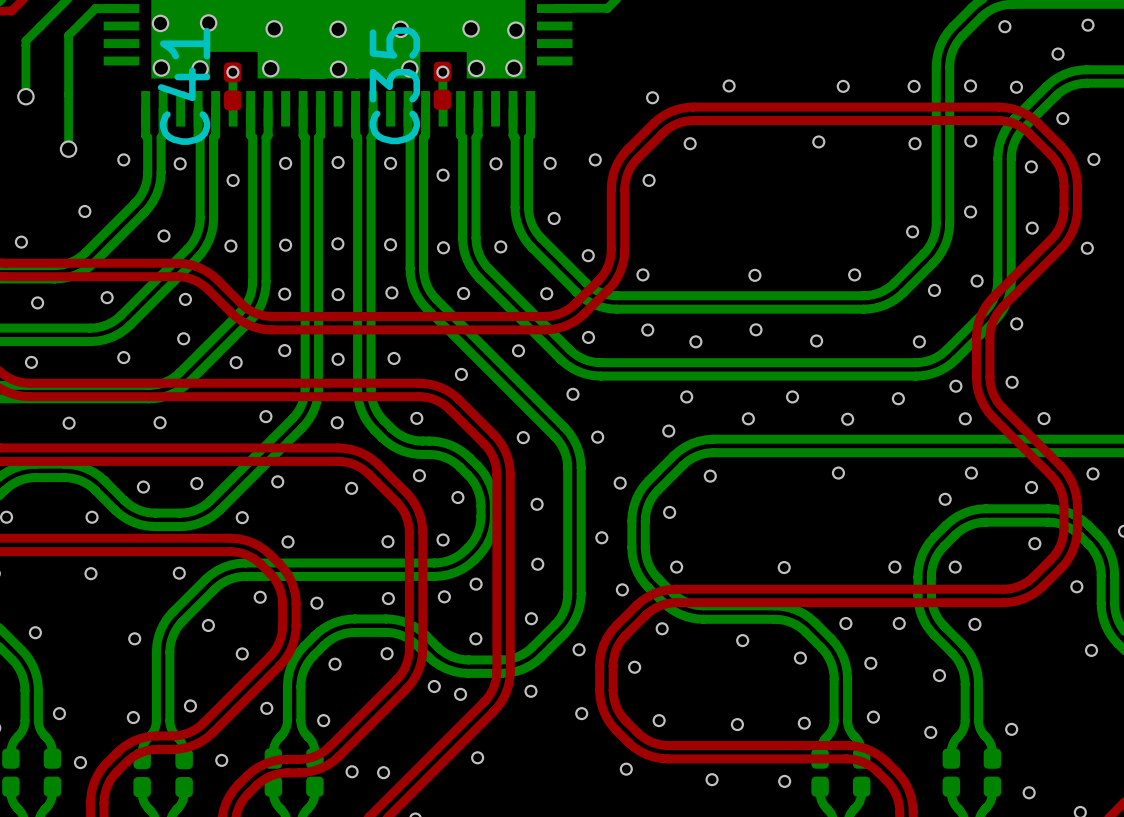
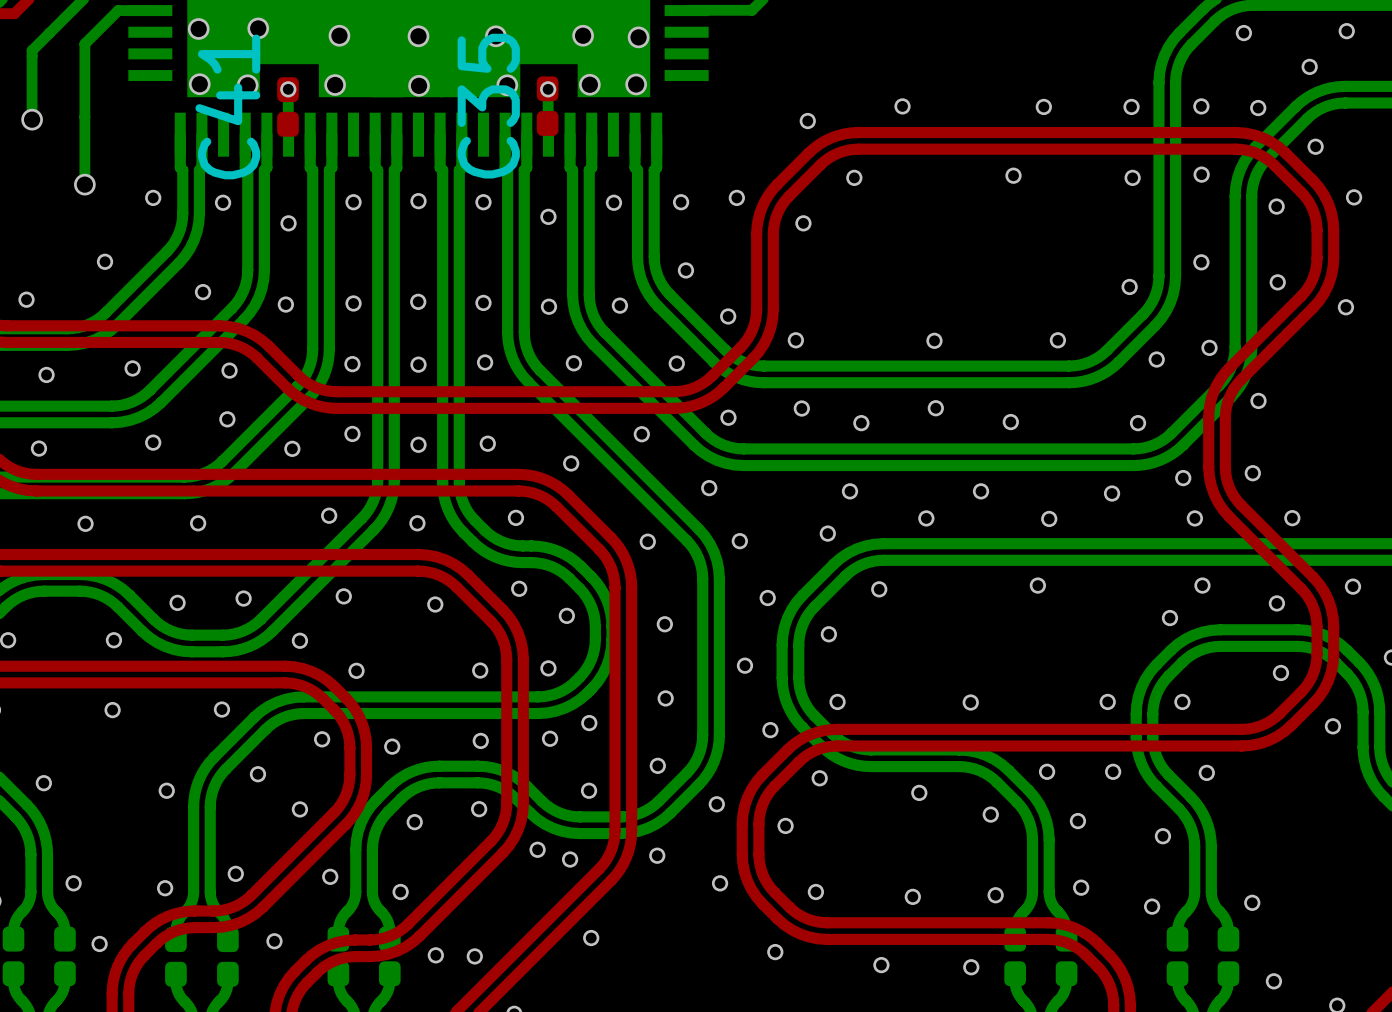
via: (1091, 650) -> none

